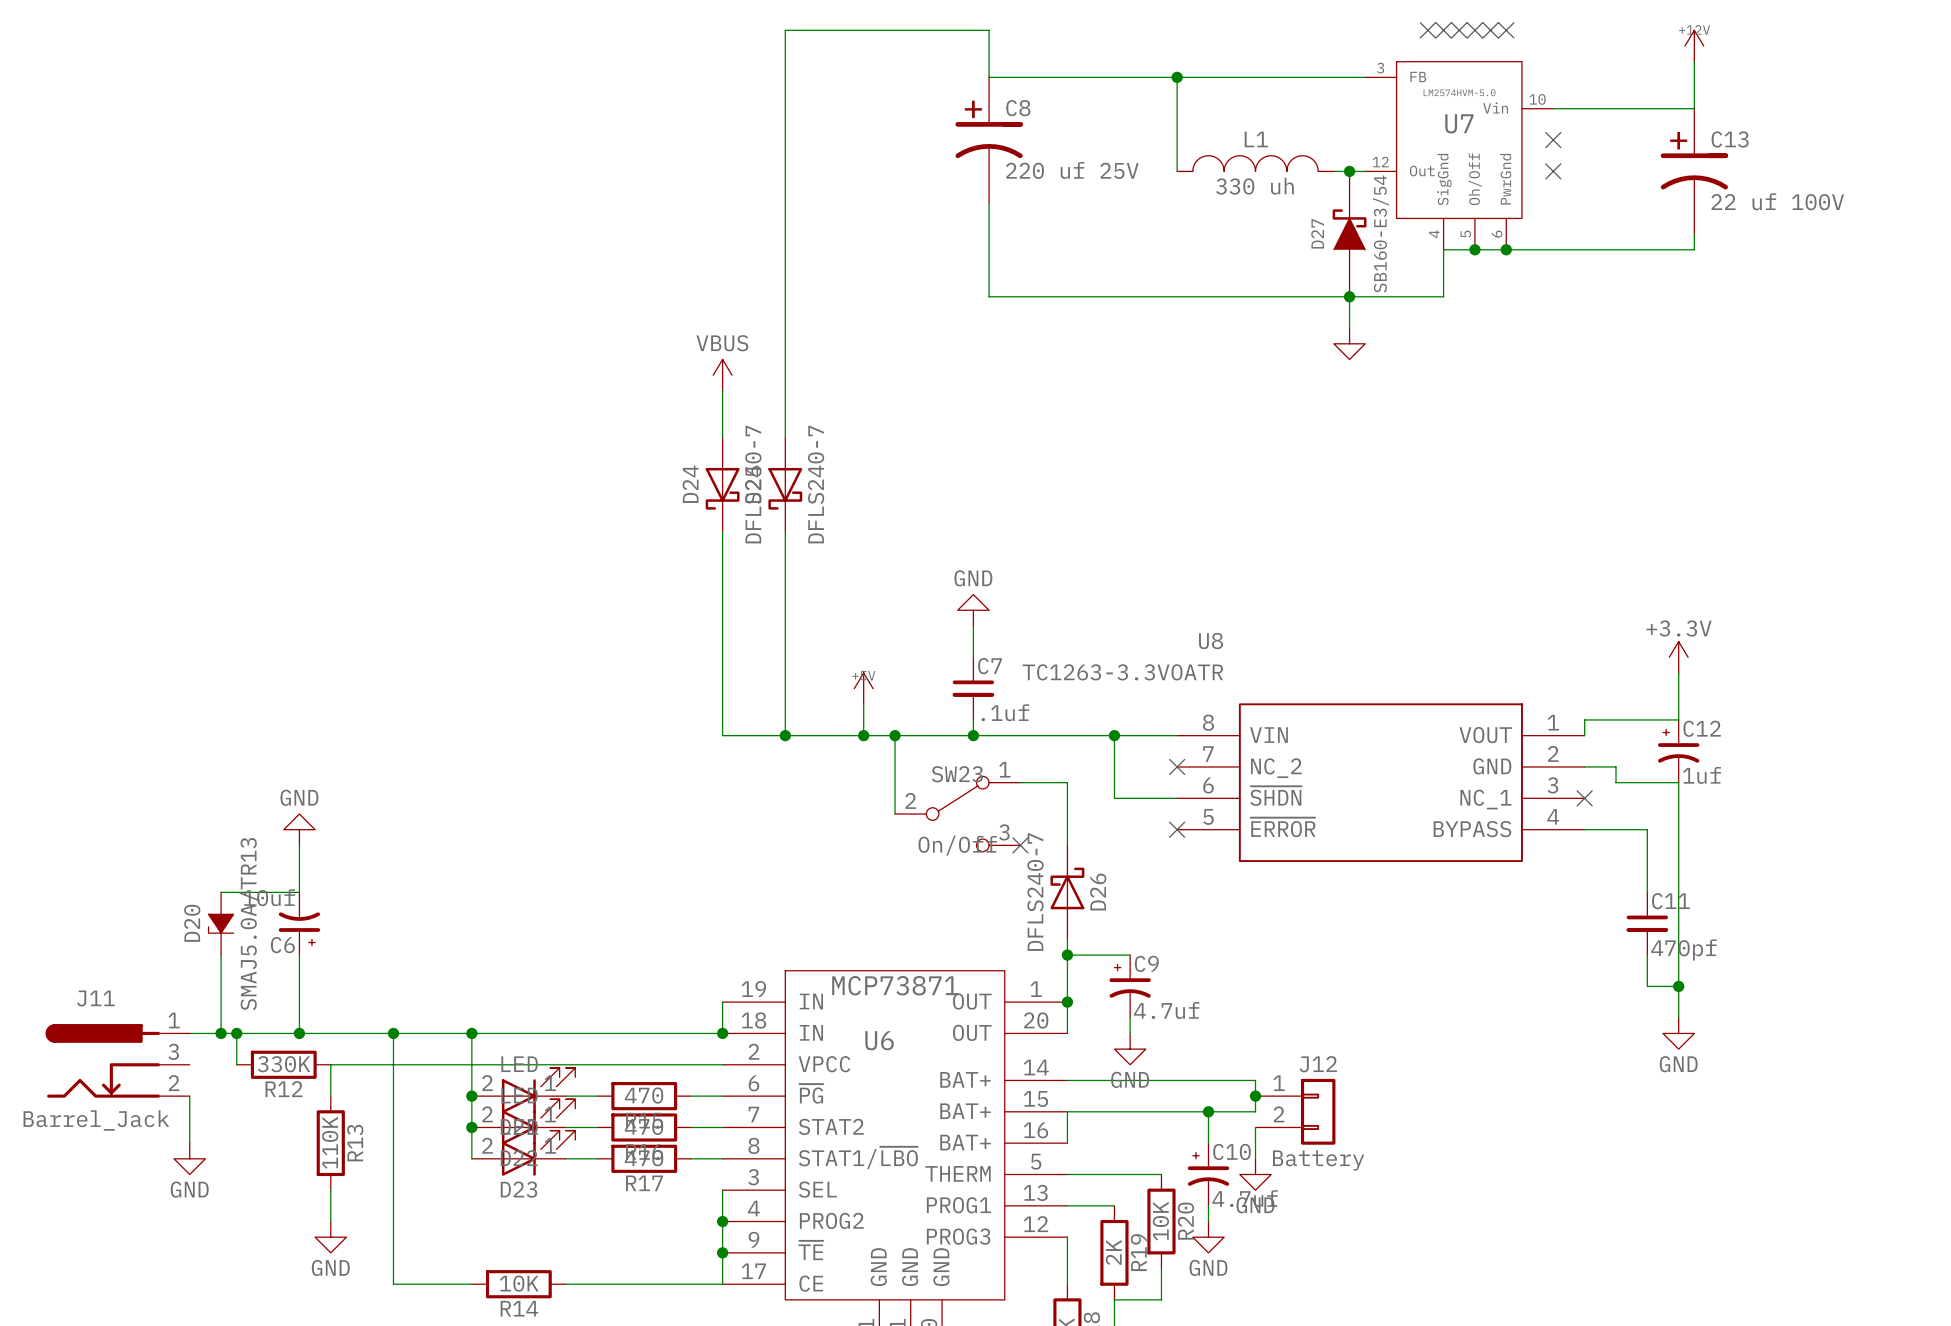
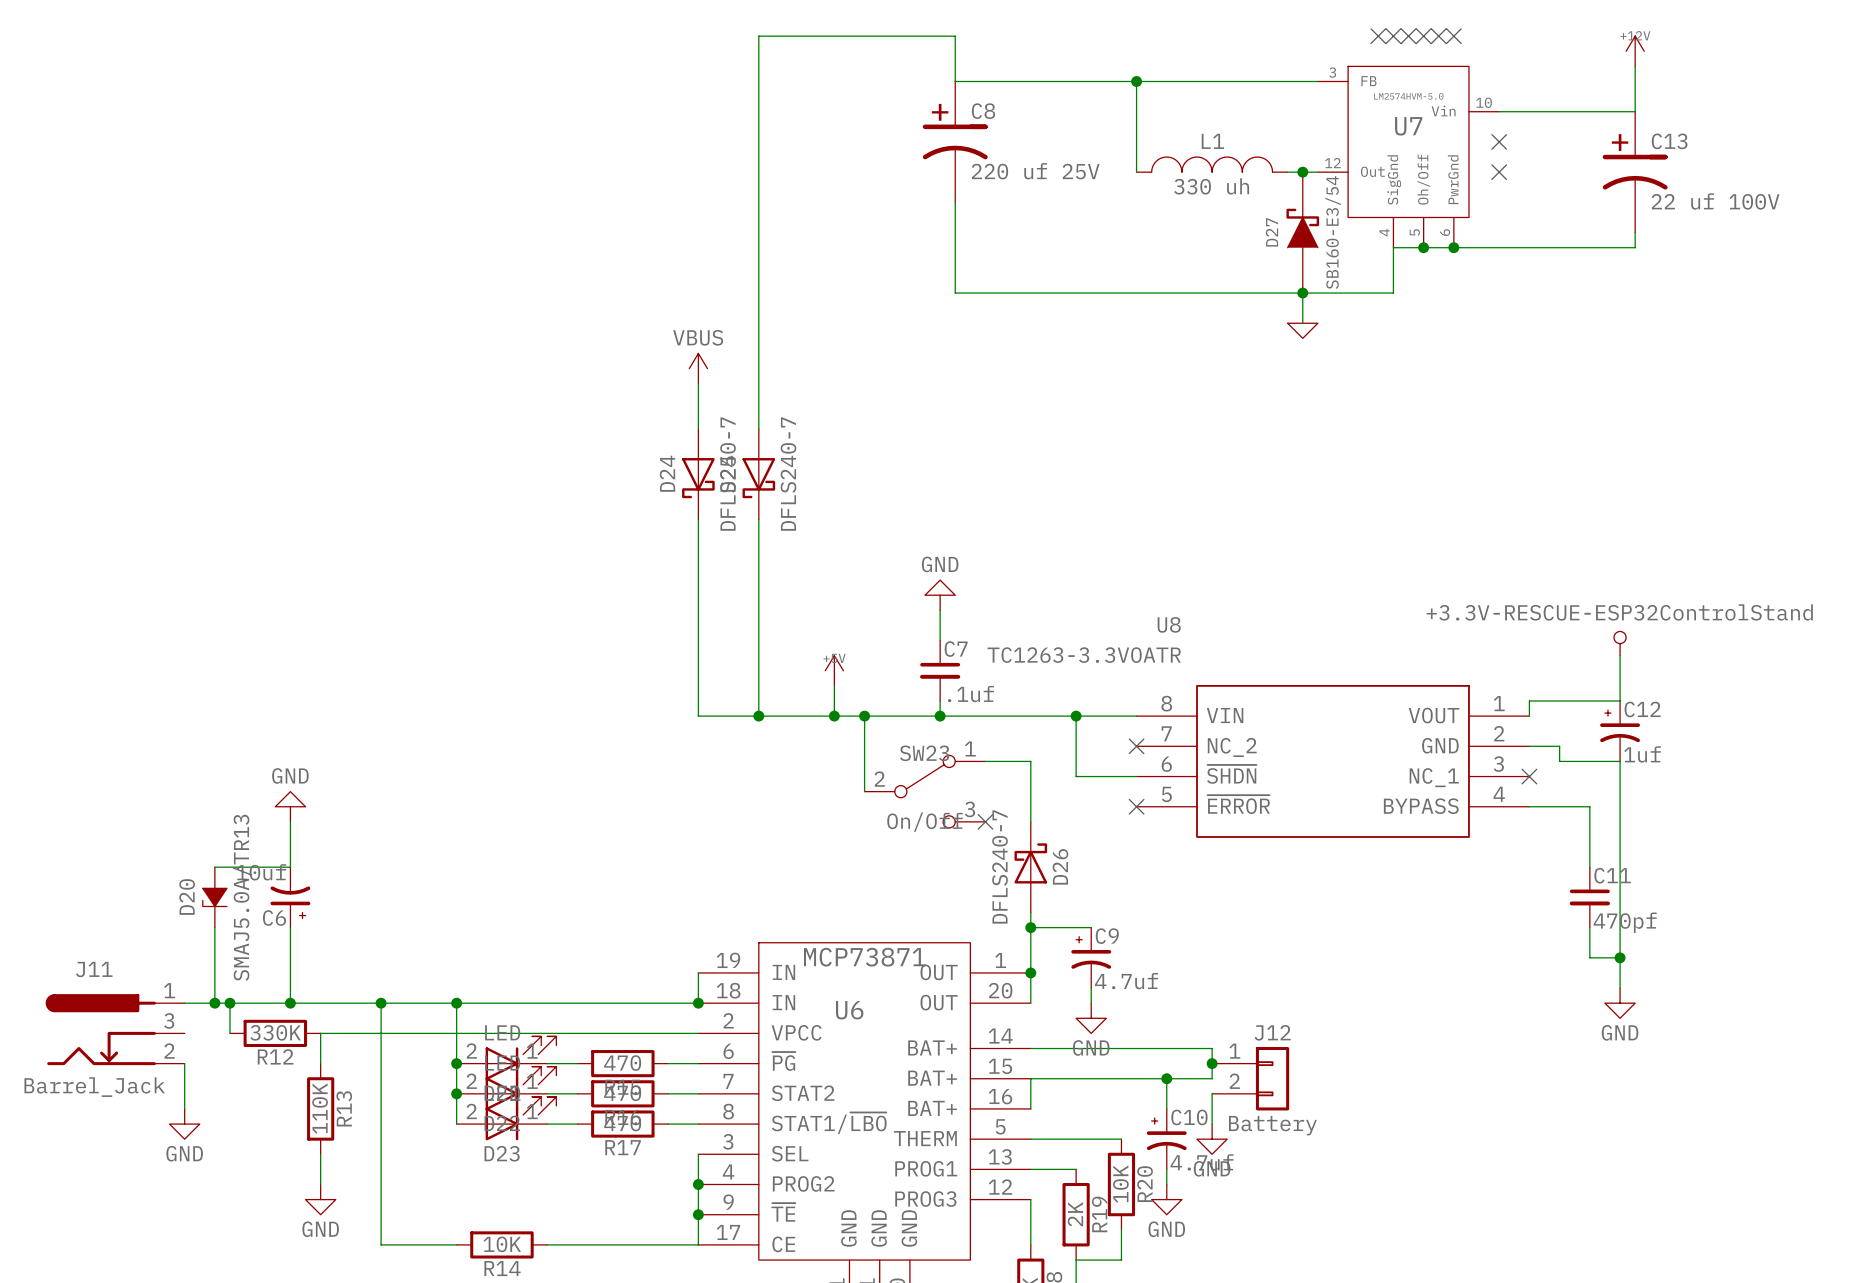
power symbol shape: [1333, 328, 1366, 360] -> [1287, 323, 1318, 339]
power symbol: +3.3V (1678, 657) -> +3.3V-RESCUE-ESP32ControlStand (1620, 643)

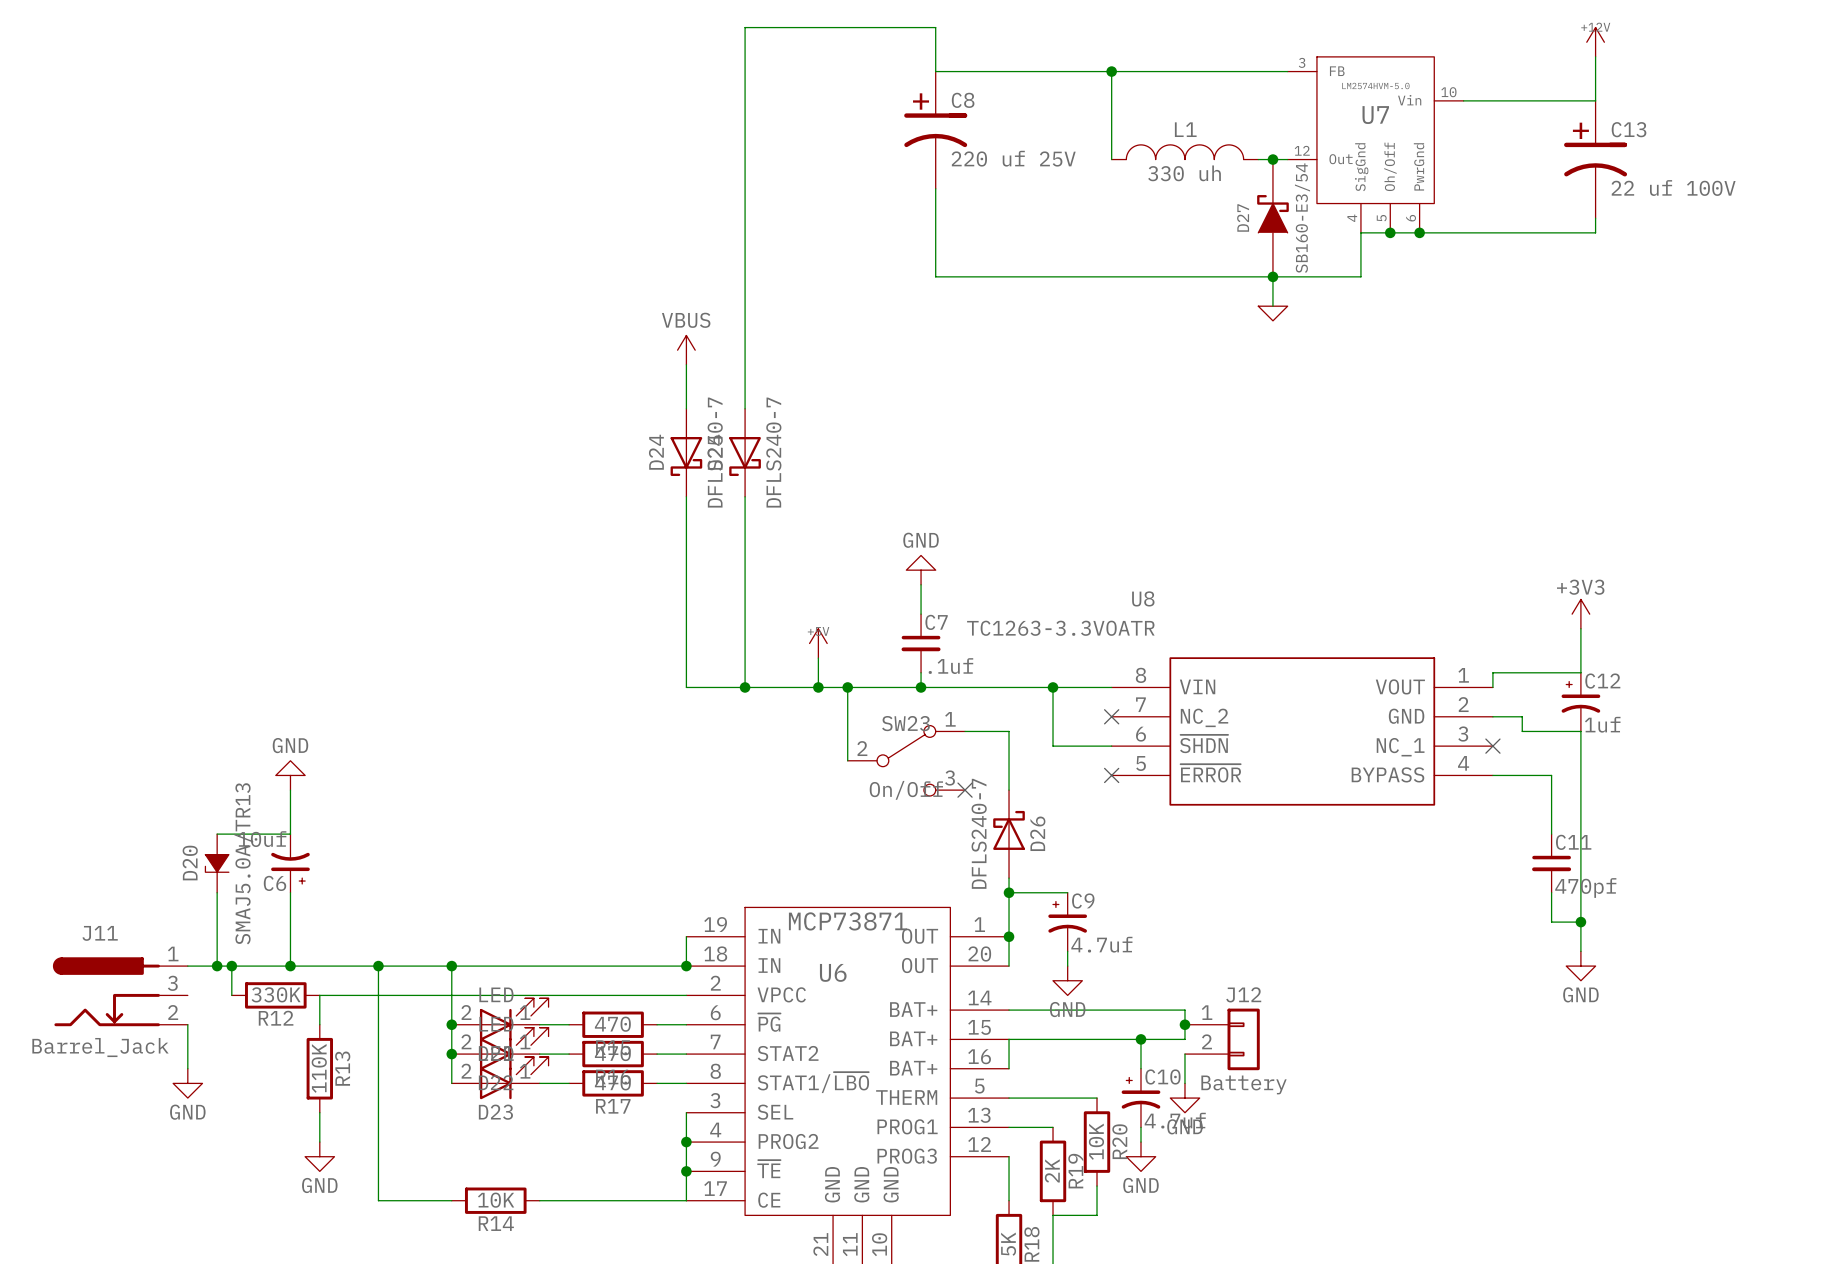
no-connect mark: (1378, 36) -> none
no-connect mark: (1393, 36) -> none
no-connect mark: (1408, 36) -> none
no-connect mark: (1423, 36) -> none
no-connect mark: (1438, 36) -> none
no-connect mark: (1453, 36) -> none
no-connect mark: (1499, 141) -> none
no-connect mark: (1499, 172) -> none
power symbol: +3.3V-RESCUE-ESP32ControlStand (1620, 643) -> +3V3 (1580, 614)

